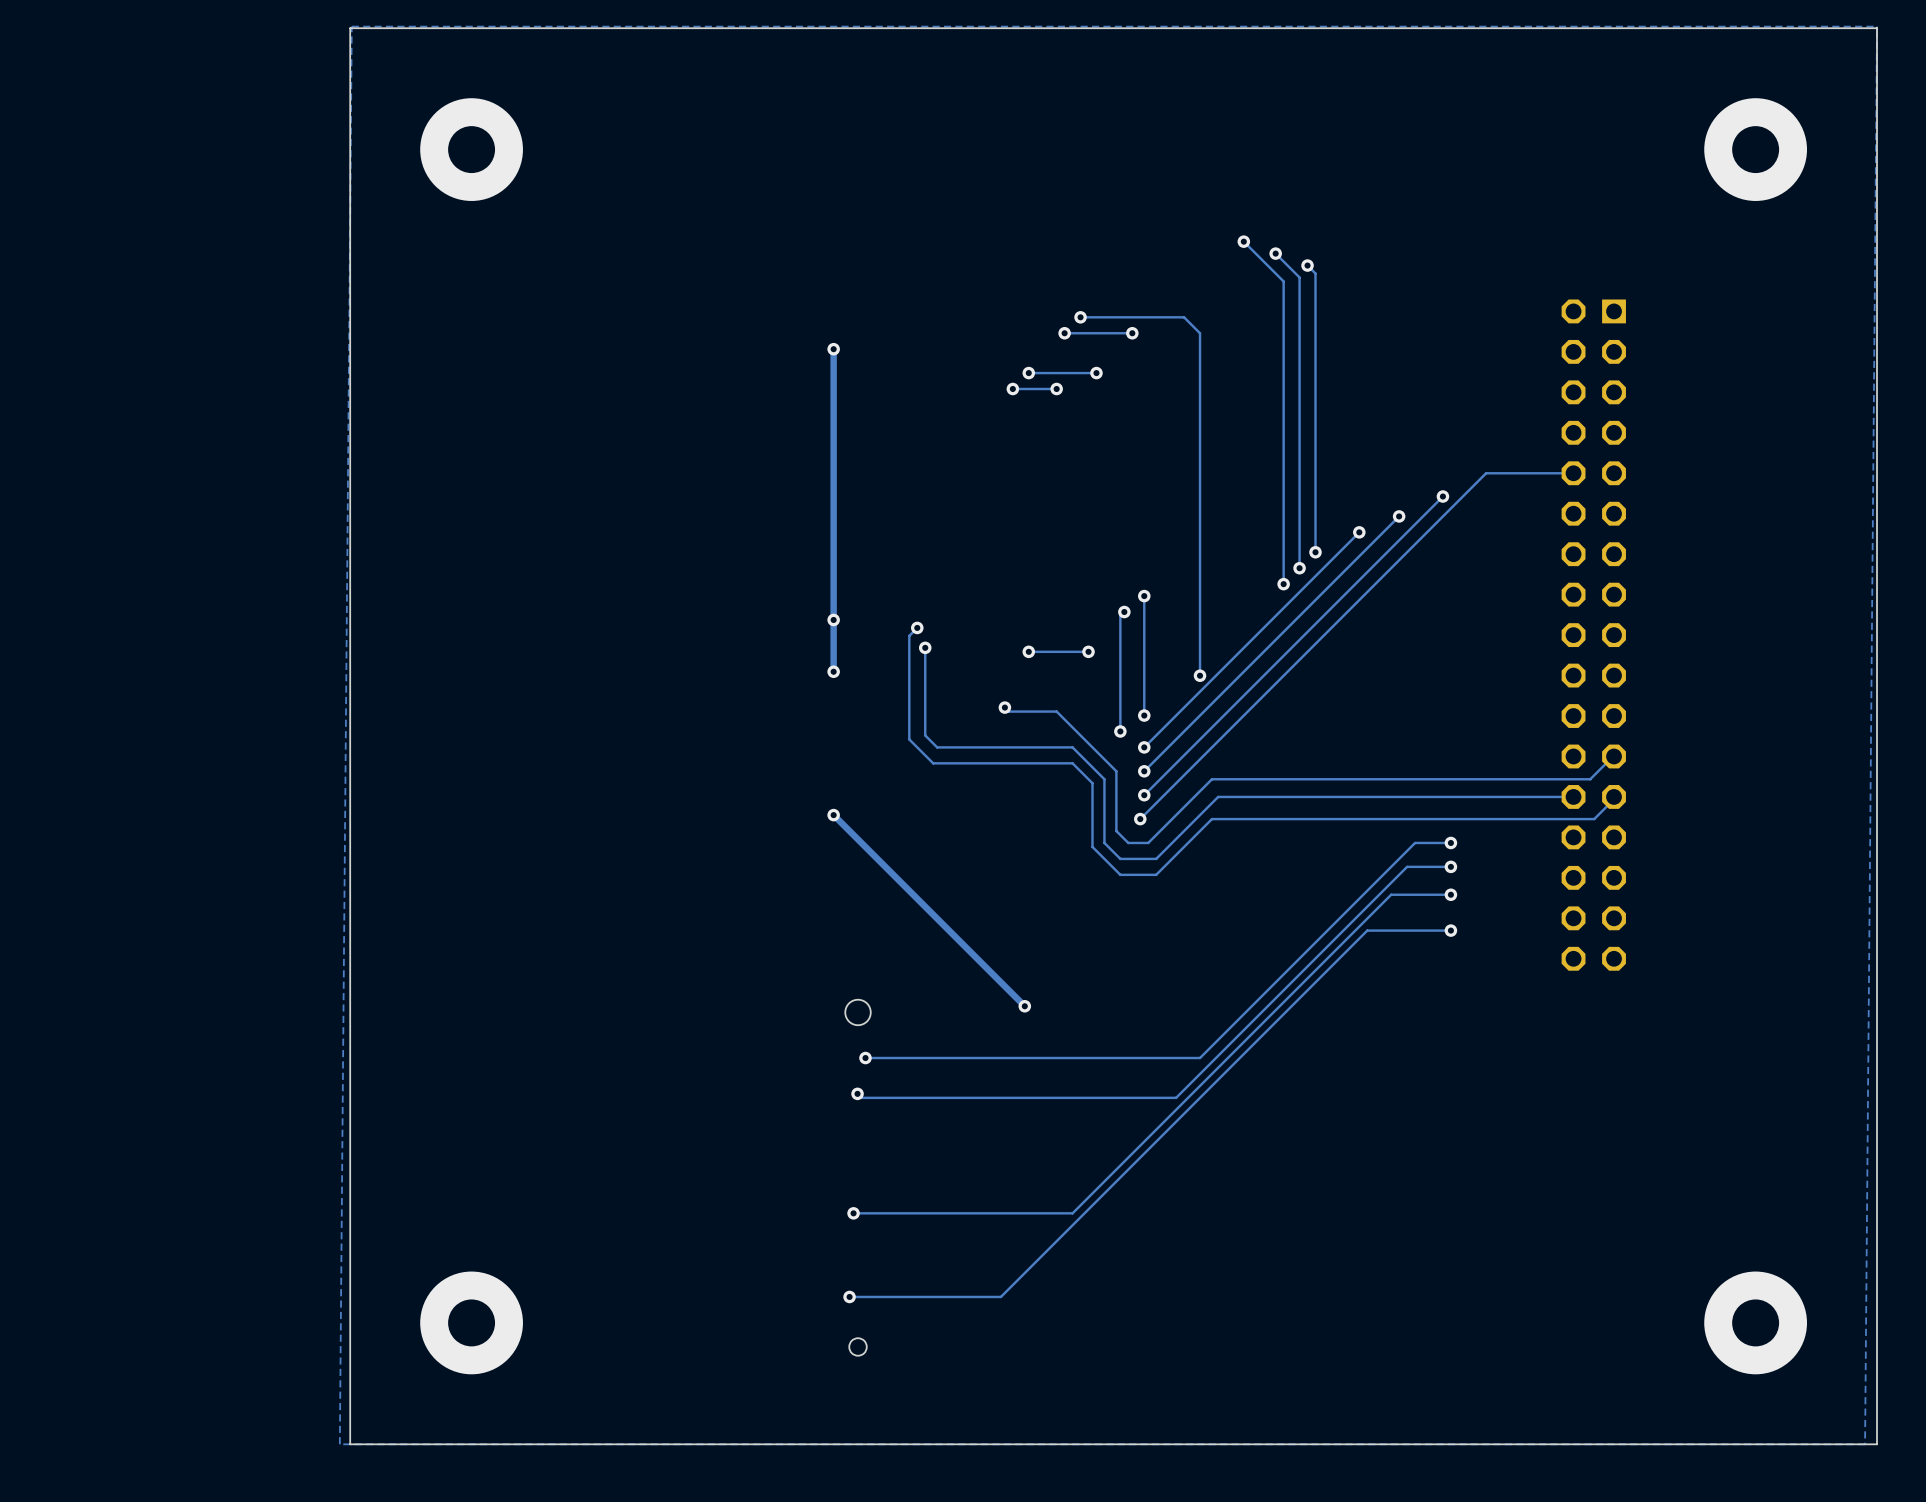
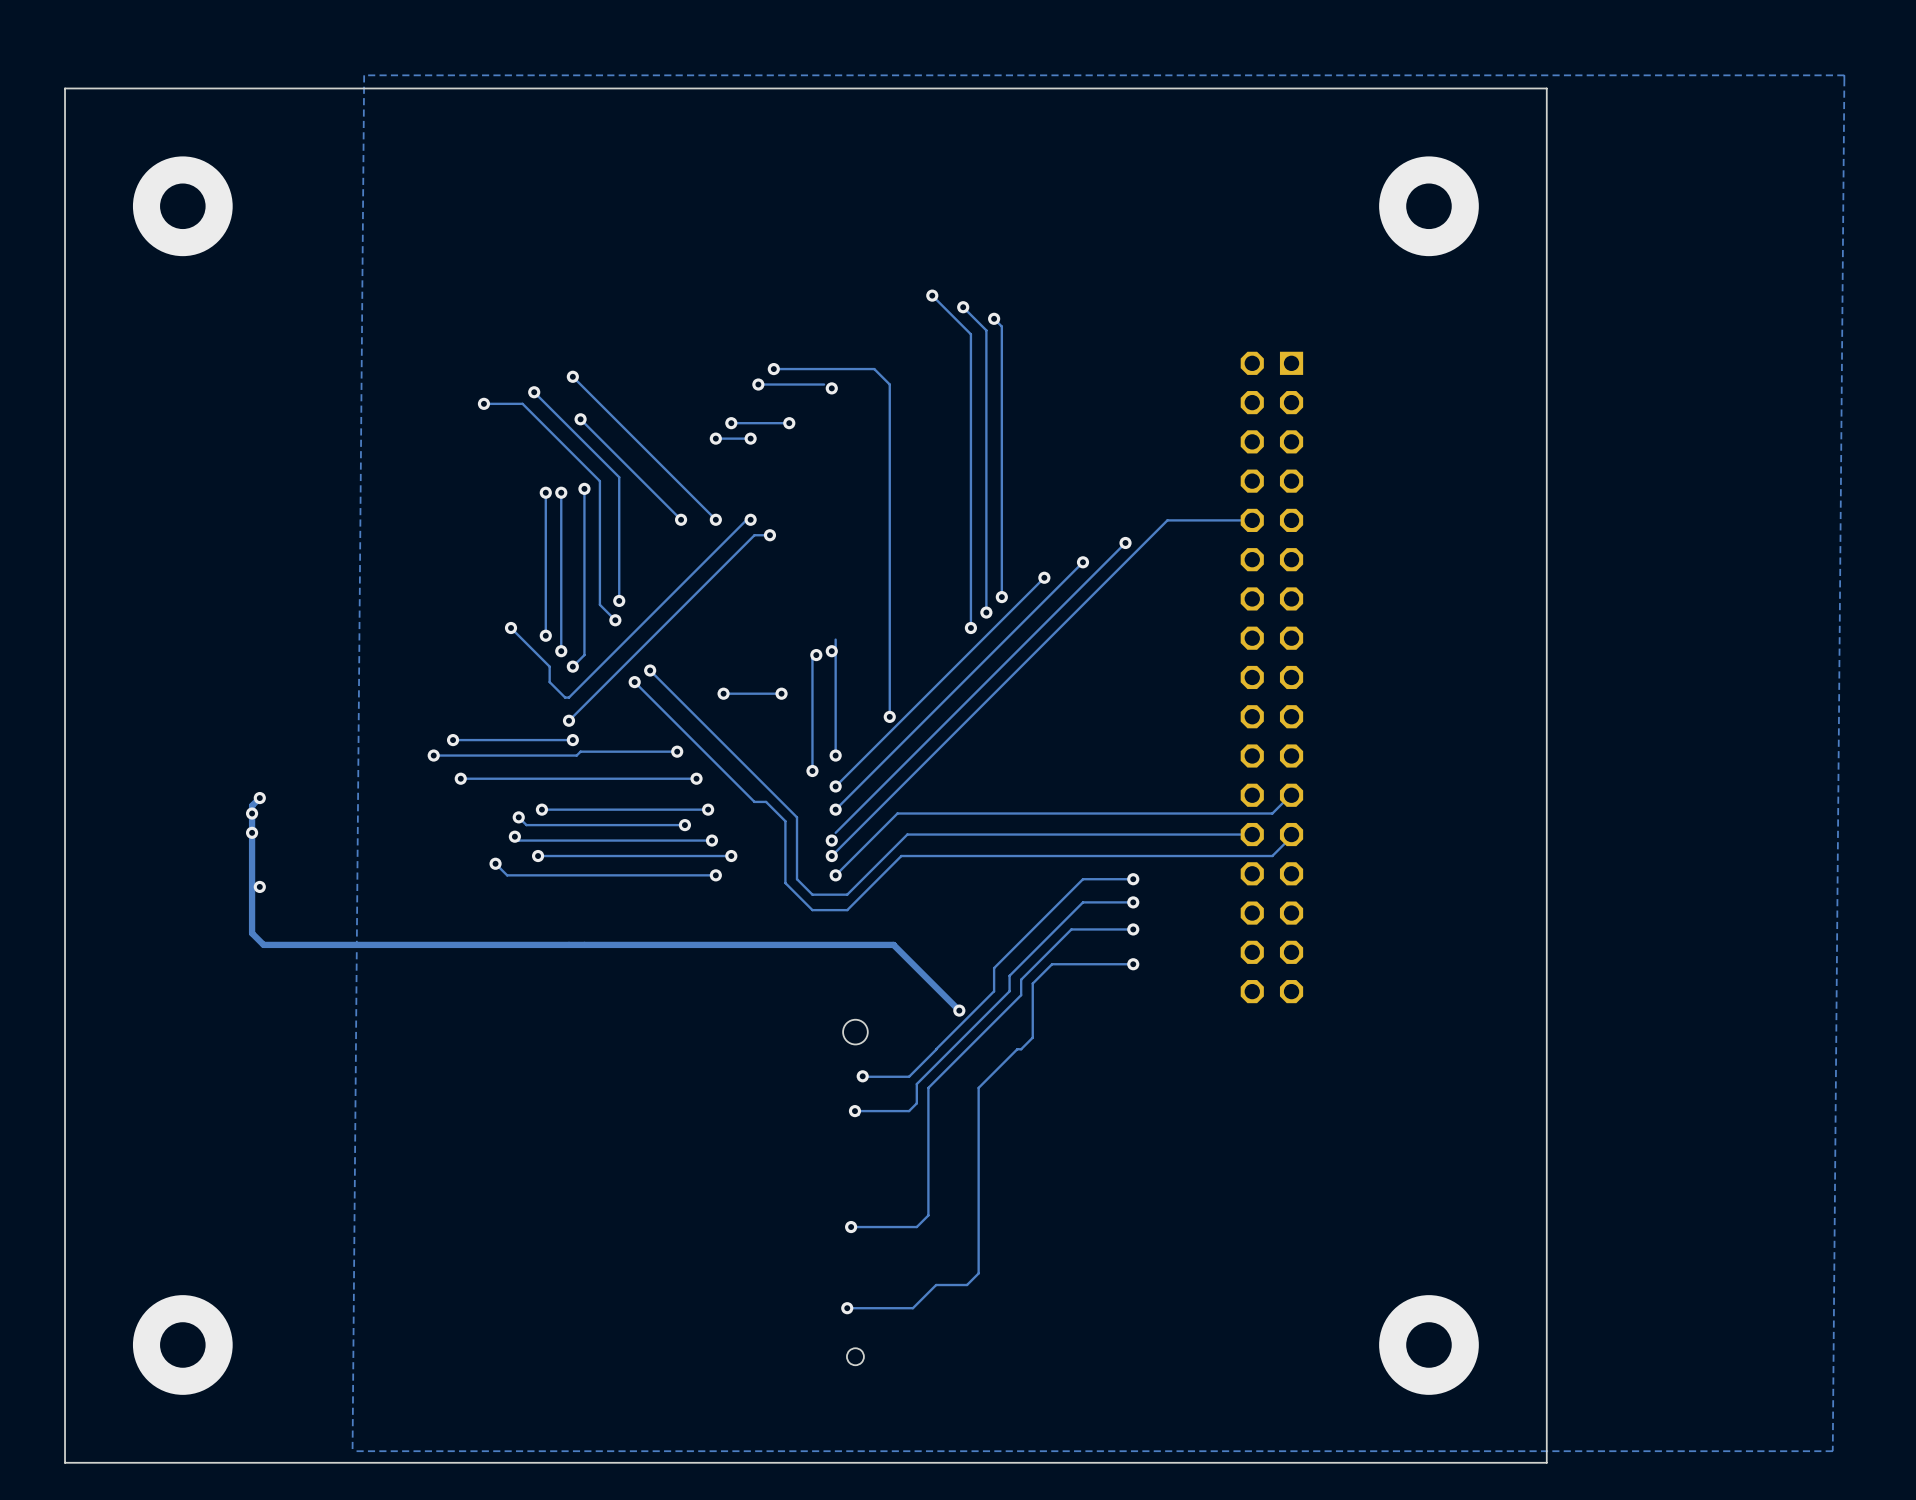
board edge: (1877, 28) (350, 28) (350, 1444) (1877, 1444) (1877, 28) -> (1546, 88) (65, 88) (65, 1462) (1546, 1462) (1546, 88)
via: (471, 149) -> none
via: (1755, 149) -> none
via: none -> (182, 206)
via: none -> (1428, 206)
track: (1243, 241) (1283, 281) (1283, 584) -> (932, 295) (970, 334) (970, 628)
via: (1243, 241) -> none
via: none -> (932, 295)
track: (1275, 253) (1299, 277) (1299, 568) -> (963, 307) (986, 330) (986, 612)
via: (1275, 253) -> none
via: none -> (963, 307)
track: (1307, 265) (1315, 273) (1315, 552) -> (994, 318) (1001, 326) (1001, 597)
via: (1307, 265) -> none
via: none -> (994, 318)
track: (1080, 317) (1184, 317) (1200, 333) (1200, 675) -> (773, 369) (874, 369) (889, 384) (889, 716)
via: (1080, 317) -> none
via: none -> (773, 369)
via: (1064, 333) -> none
track: (1132, 333) (1064, 333) -> (824, 384) (758, 384)
via: (1132, 333) -> none
track: none -> (572, 376) (715, 519)
via: none -> (572, 376)
via: none -> (758, 384)
track: (833, 349) (833, 671) -> none
track: none -> (534, 392) (619, 477) (619, 600)
via: none -> (534, 392)
track: none -> (483, 403) (522, 403) (599, 481) (599, 604) (615, 620)
via: none -> (483, 403)
via: (1028, 373) -> none
track: (1096, 373) (1028, 373) -> none
via: (1096, 373) -> none
track: none -> (580, 419) (681, 519)
via: none -> (580, 419)
via: none -> (731, 423)
track: none -> (789, 423) (731, 423)
via: none -> (789, 423)
via: (1012, 389) -> none
track: (1056, 389) (1012, 389) -> none
via: (1056, 389) -> none
via: none -> (715, 438)
track: none -> (750, 438) (715, 438)
via: none -> (750, 438)
track: none -> (584, 488) (584, 655) (572, 666)
via: none -> (584, 488)
track: none -> (545, 492) (545, 635)
via: none -> (545, 492)
track: none -> (561, 492) (561, 651)
via: none -> (561, 492)
track: (1573, 473) (1486, 473) (1140, 819) -> (1252, 520) (1167, 520) (831, 856)
via: none -> (681, 519)
via: none -> (715, 519)
track: none -> (750, 519) (746, 519) (568, 697) (565, 697) (549, 682) (549, 666) (511, 628)
via: none -> (750, 519)
track: (1442, 496) (1144, 795) -> (1125, 542) (835, 832)
via: (1442, 496) -> none
track: none -> (769, 535) (754, 535) (568, 720)
via: none -> (769, 535)
via: none -> (1125, 542)
track: (1399, 516) (1144, 771) -> (1083, 562) (835, 809)
via: (1399, 516) -> none
via: none -> (1083, 562)
track: (1359, 532) (1144, 747) -> (1044, 577) (835, 786)
via: (1359, 532) -> none
via: none -> (1044, 577)
via: (1315, 552) -> none
via: none -> (1001, 597)
via: none -> (619, 600)
via: (1299, 568) -> none
via: none -> (986, 612)
via: (1283, 584) -> none
via: none -> (615, 620)
via: none -> (511, 628)
via: none -> (970, 628)
track: (1144, 596) (1144, 715) -> (835, 639) (835, 755)
via: (1144, 596) -> none
via: none -> (545, 635)
track: (1124, 612) (1120, 615) (1120, 731) -> (816, 655) (812, 658) (812, 770)
via: (1124, 612) -> none
via: none -> (561, 651)
via: none -> (816, 655)
track: (917, 627) (909, 635) (909, 739) (933, 763) (1072, 763) (1092, 783) (1092, 846) (1120, 874) (1156, 874) (1211, 819) (1594, 819) (1614, 799) (1614, 796) -> none
via: (917, 627) -> none
via: none -> (572, 666)
part position: (1593, 635) -> (1271, 677)
track: none -> (650, 670) (797, 817) (797, 879) (812, 894) (847, 894) (907, 834) (1252, 834)
via: none -> (650, 670)
track: (925, 647) (925, 735) (937, 747) (1072, 747) (1104, 779) (1104, 842) (1120, 858) (1156, 858) (1218, 796) (1573, 796) -> none
via: (925, 647) -> none
track: none -> (634, 682) (754, 801) (766, 801) (785, 821) (785, 883) (812, 910) (847, 910) (901, 856) (1272, 856) (1291, 836) (1291, 834)
via: none -> (634, 682)
via: (1028, 651) -> none
track: (1088, 651) (1028, 651) -> (781, 693) (723, 693)
via: (1088, 651) -> none
via: none -> (723, 693)
via: none -> (781, 693)
via: (833, 671) -> none
via: (1200, 675) -> none
via: none -> (889, 716)
via: none -> (568, 720)
track: (1004, 707) (1008, 711) (1056, 711) (1116, 771) (1116, 831) (1128, 842) (1148, 842) (1211, 779) (1590, 779) (1613, 756) -> none
via: (1004, 707) -> none
via: none -> (453, 740)
track: none -> (572, 740) (453, 740)
via: none -> (572, 740)
via: (1144, 715) -> none
track: none -> (677, 751) (580, 751) (576, 755) (433, 755)
via: none -> (677, 751)
via: none -> (433, 755)
via: none -> (835, 755)
via: (1120, 731) -> none
via: none -> (812, 770)
via: (1144, 747) -> none
via: none -> (460, 778)
track: none -> (696, 778) (460, 778)
via: none -> (696, 778)
via: none -> (835, 786)
track: none -> (1291, 795) (1272, 813) (897, 813) (835, 875)
track: none -> (259, 798) (252, 805) (252, 933) (263, 944) (893, 944) (959, 1010)
via: none -> (259, 798)
via: (1144, 771) -> none
via: none -> (541, 809)
track: none -> (708, 809) (541, 809)
via: none -> (708, 809)
via: none -> (835, 809)
via: none -> (252, 813)
track: none -> (518, 817) (526, 825) (684, 825)
via: none -> (518, 817)
via: (1144, 795) -> none
via: none -> (684, 825)
via: none -> (252, 832)
track: none -> (514, 836) (518, 840) (711, 840)
via: none -> (514, 836)
via: none -> (711, 840)
track: (833, 815) (1024, 1006) -> none
via: (1140, 819) -> none
via: none -> (538, 856)
track: none -> (731, 856) (538, 856)
via: none -> (731, 856)
via: none -> (831, 856)
track: none -> (495, 863) (507, 875) (715, 875)
via: none -> (495, 863)
track: (1450, 842) (1415, 842) (1200, 1058) (865, 1058) -> (1133, 879) (1083, 879) (994, 968) (994, 991) (909, 1076) (862, 1076)
via: (1450, 842) -> none
via: none -> (715, 875)
via: none -> (835, 875)
via: none -> (1133, 879)
via: none -> (259, 886)
track: (1450, 866) (1407, 866) (1176, 1097) (861, 1097) -> none
via: (1450, 866) -> none
track: none -> (1133, 902) (1083, 902) (1009, 975) (1009, 991) (916, 1084) (916, 1103) (909, 1111) (854, 1111)
via: none -> (1133, 902)
track: (1450, 894) (1391, 894) (1072, 1213) (921, 1213) -> (1133, 929) (1071, 929) (1021, 979) (1021, 995) (928, 1087) (928, 1215) (916, 1227)
via: (1450, 894) -> none
via: none -> (1133, 929)
track: (1450, 930) (1367, 930) (1000, 1296) (917, 1296) -> (1133, 964) (1052, 964) (1032, 983) (1032, 1037) (1021, 1049) (1017, 1049) (978, 1087) (978, 1273) (967, 1285) (936, 1285) (912, 1308)
via: (1450, 930) -> none
via: none -> (1133, 964)
via position: (1024, 1006) -> (959, 1010)
via: (471, 1322) -> none
via: (1755, 1322) -> none
via: none -> (182, 1344)
via: none -> (1428, 1344)

